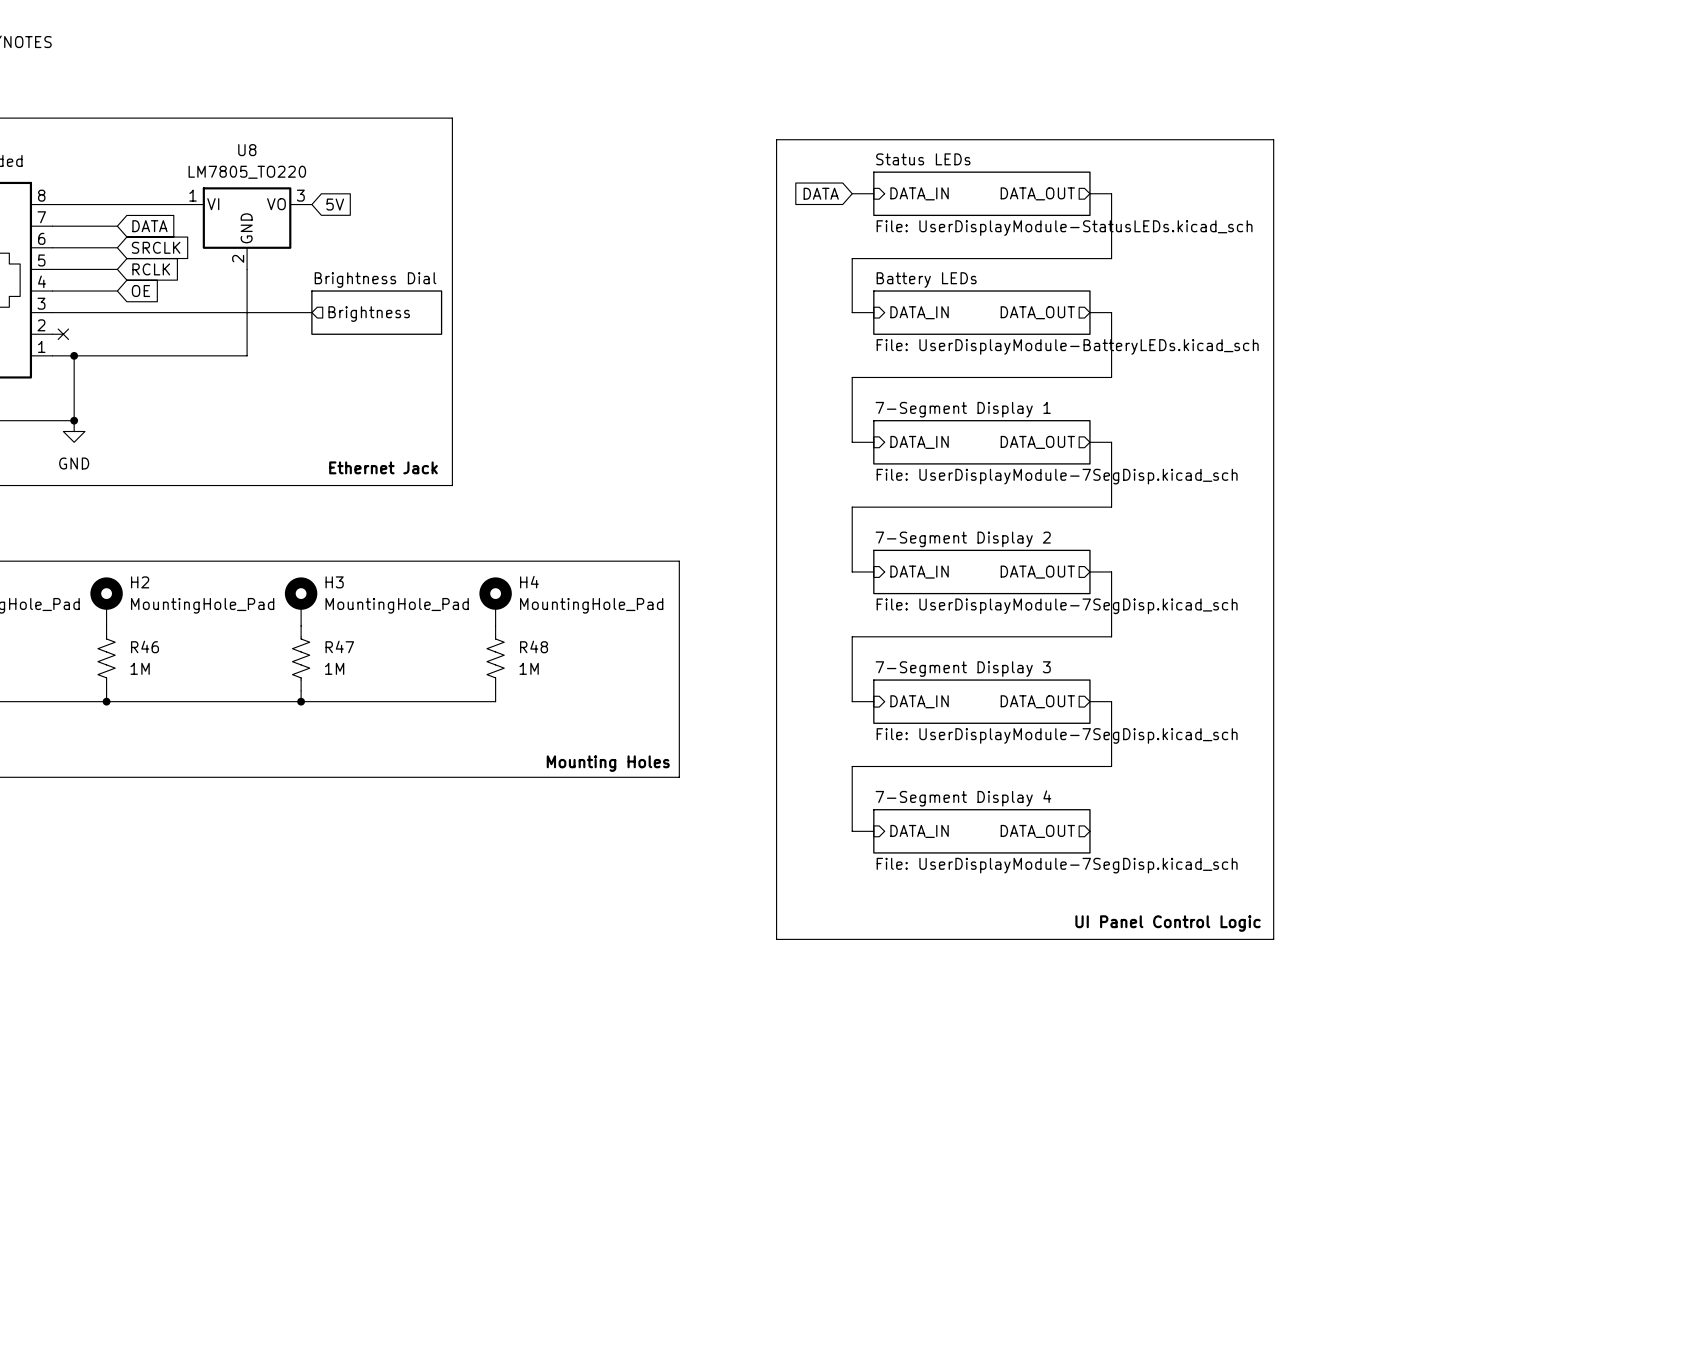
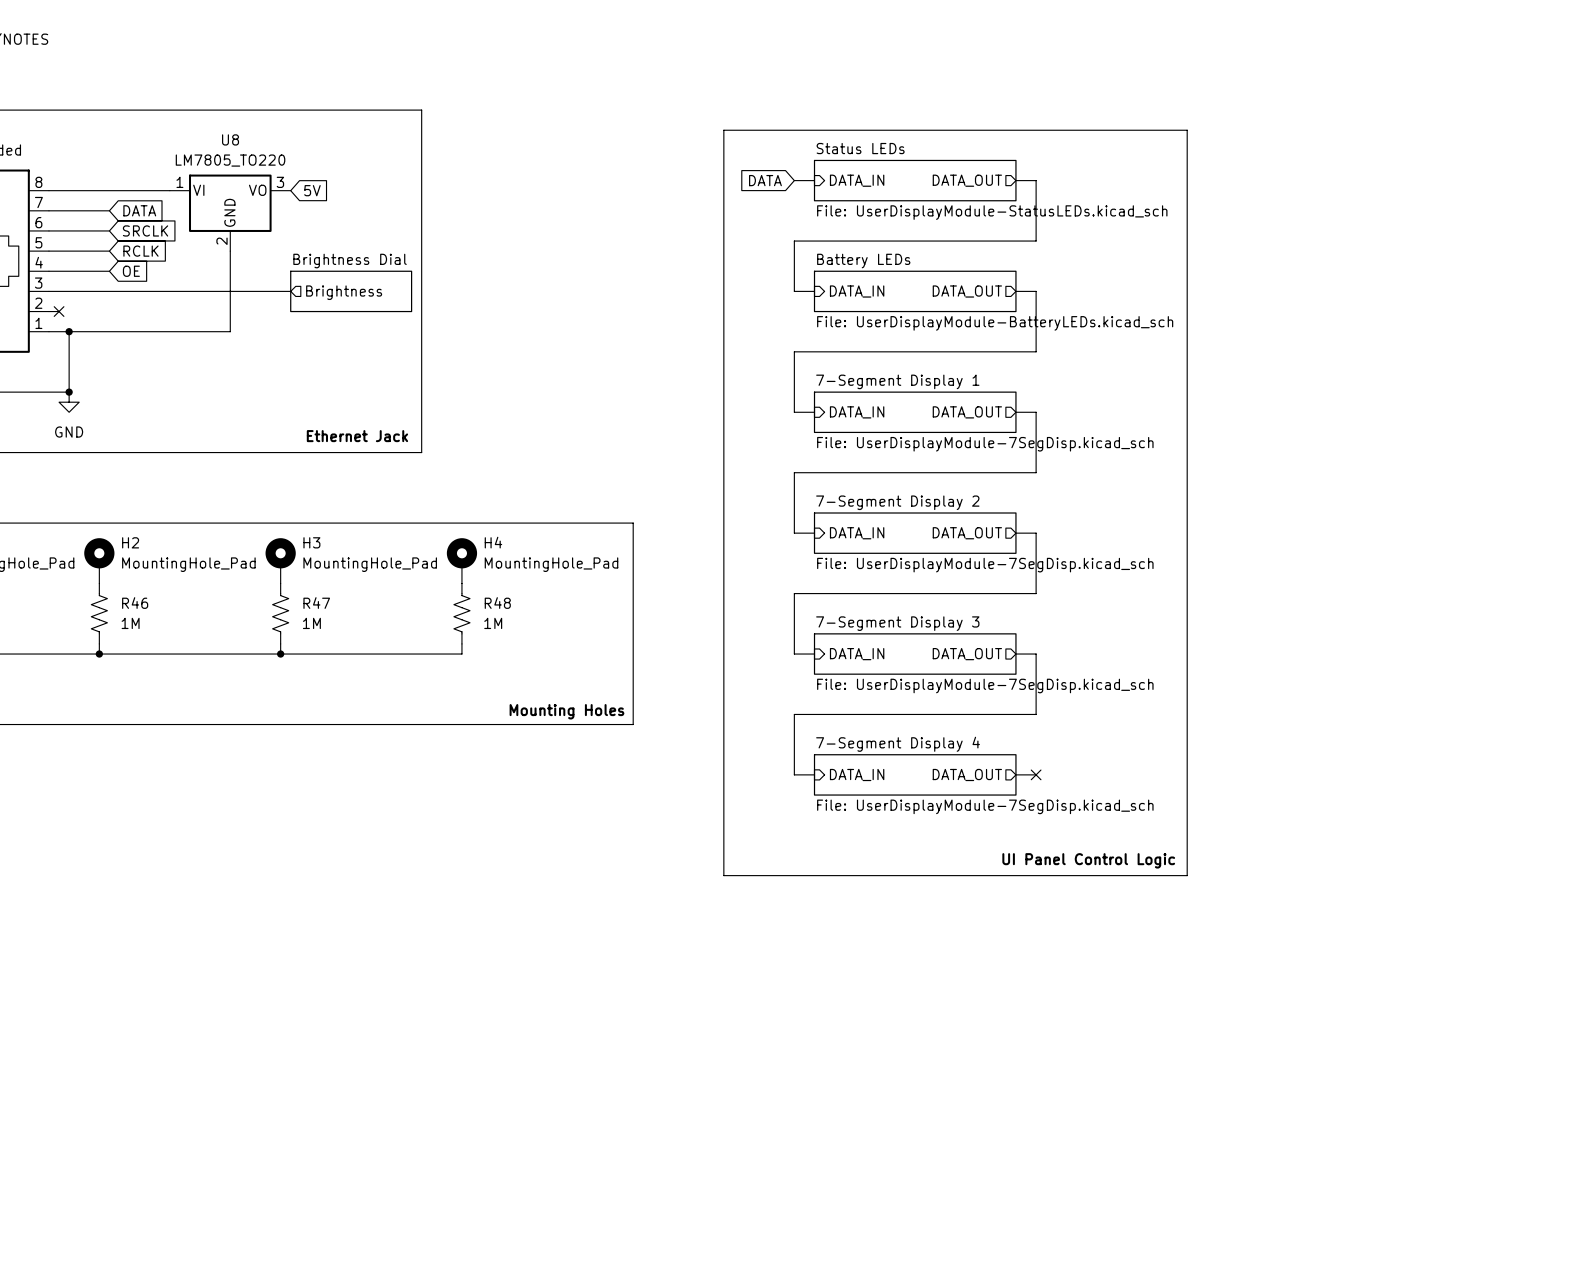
wire: none -> (1015, 774) (1036, 774)
no-connect mark: none -> (1036, 774)

